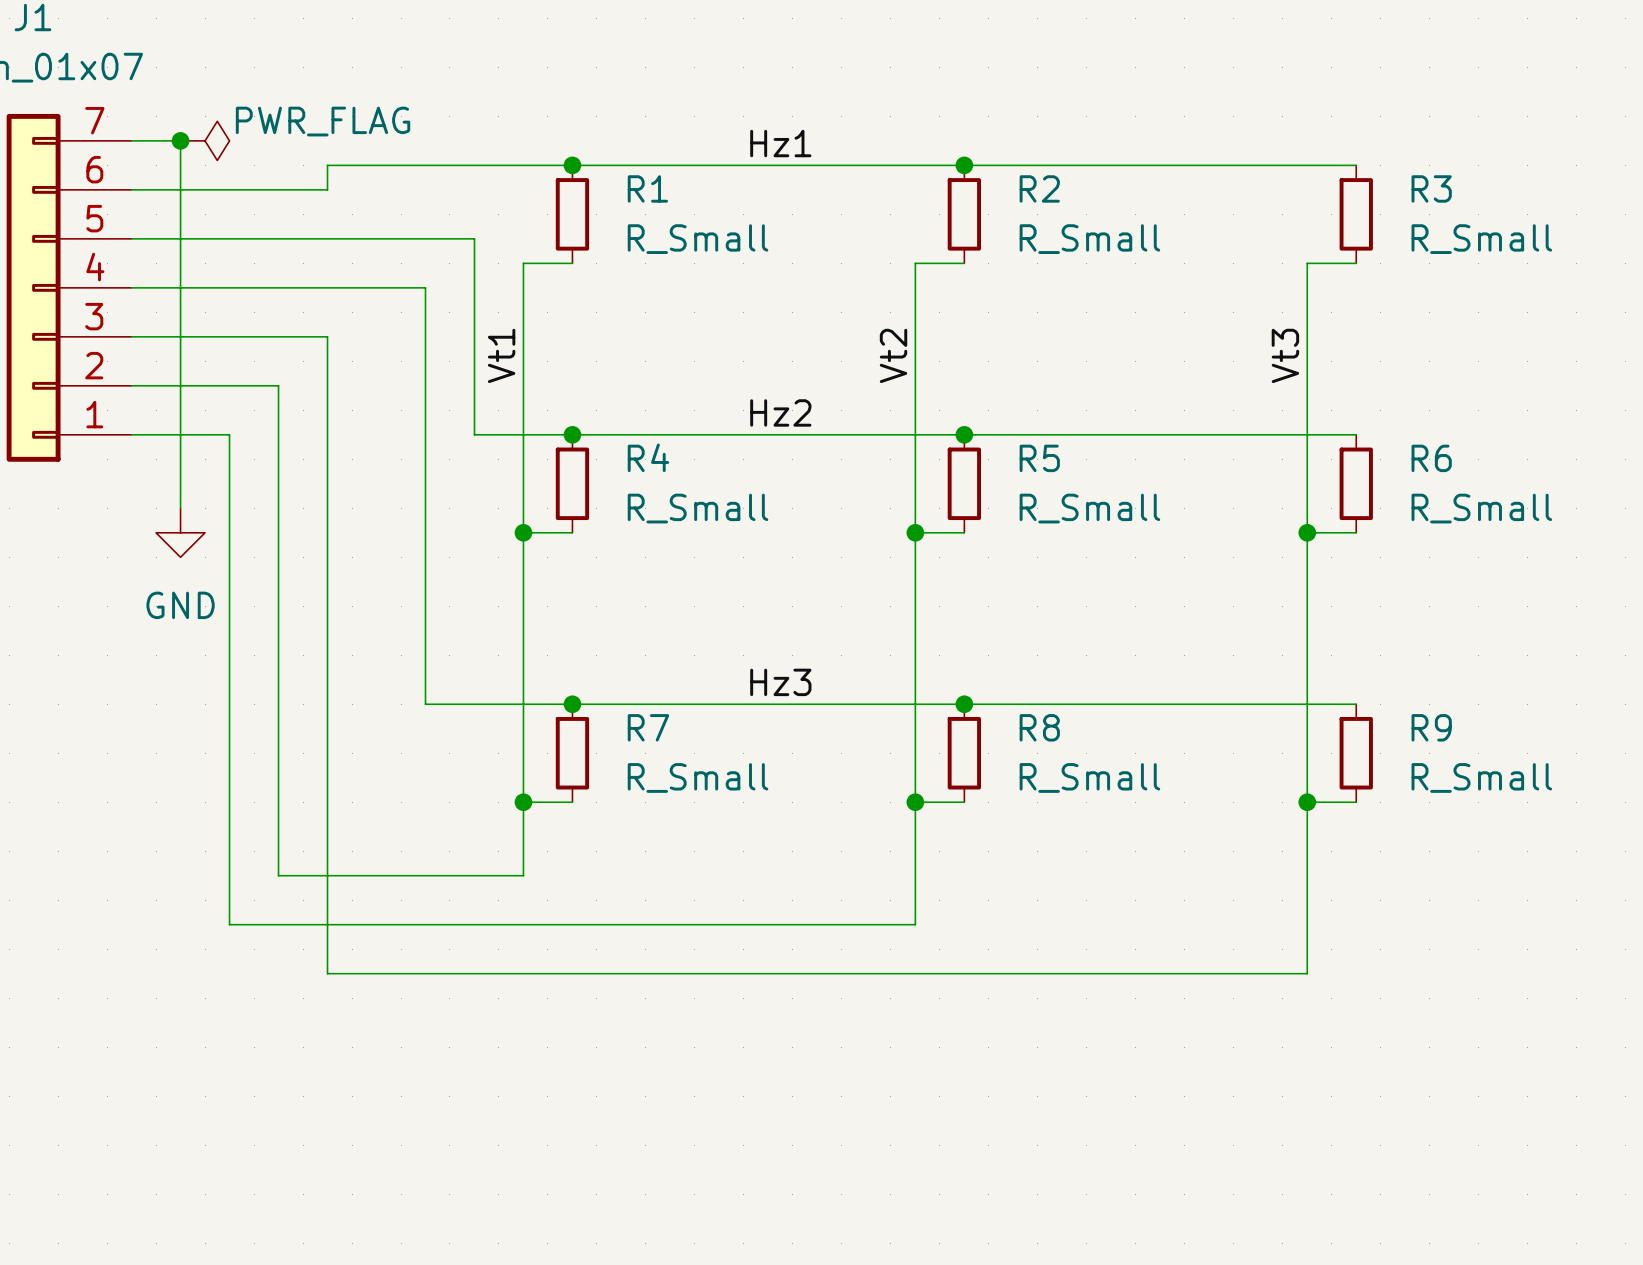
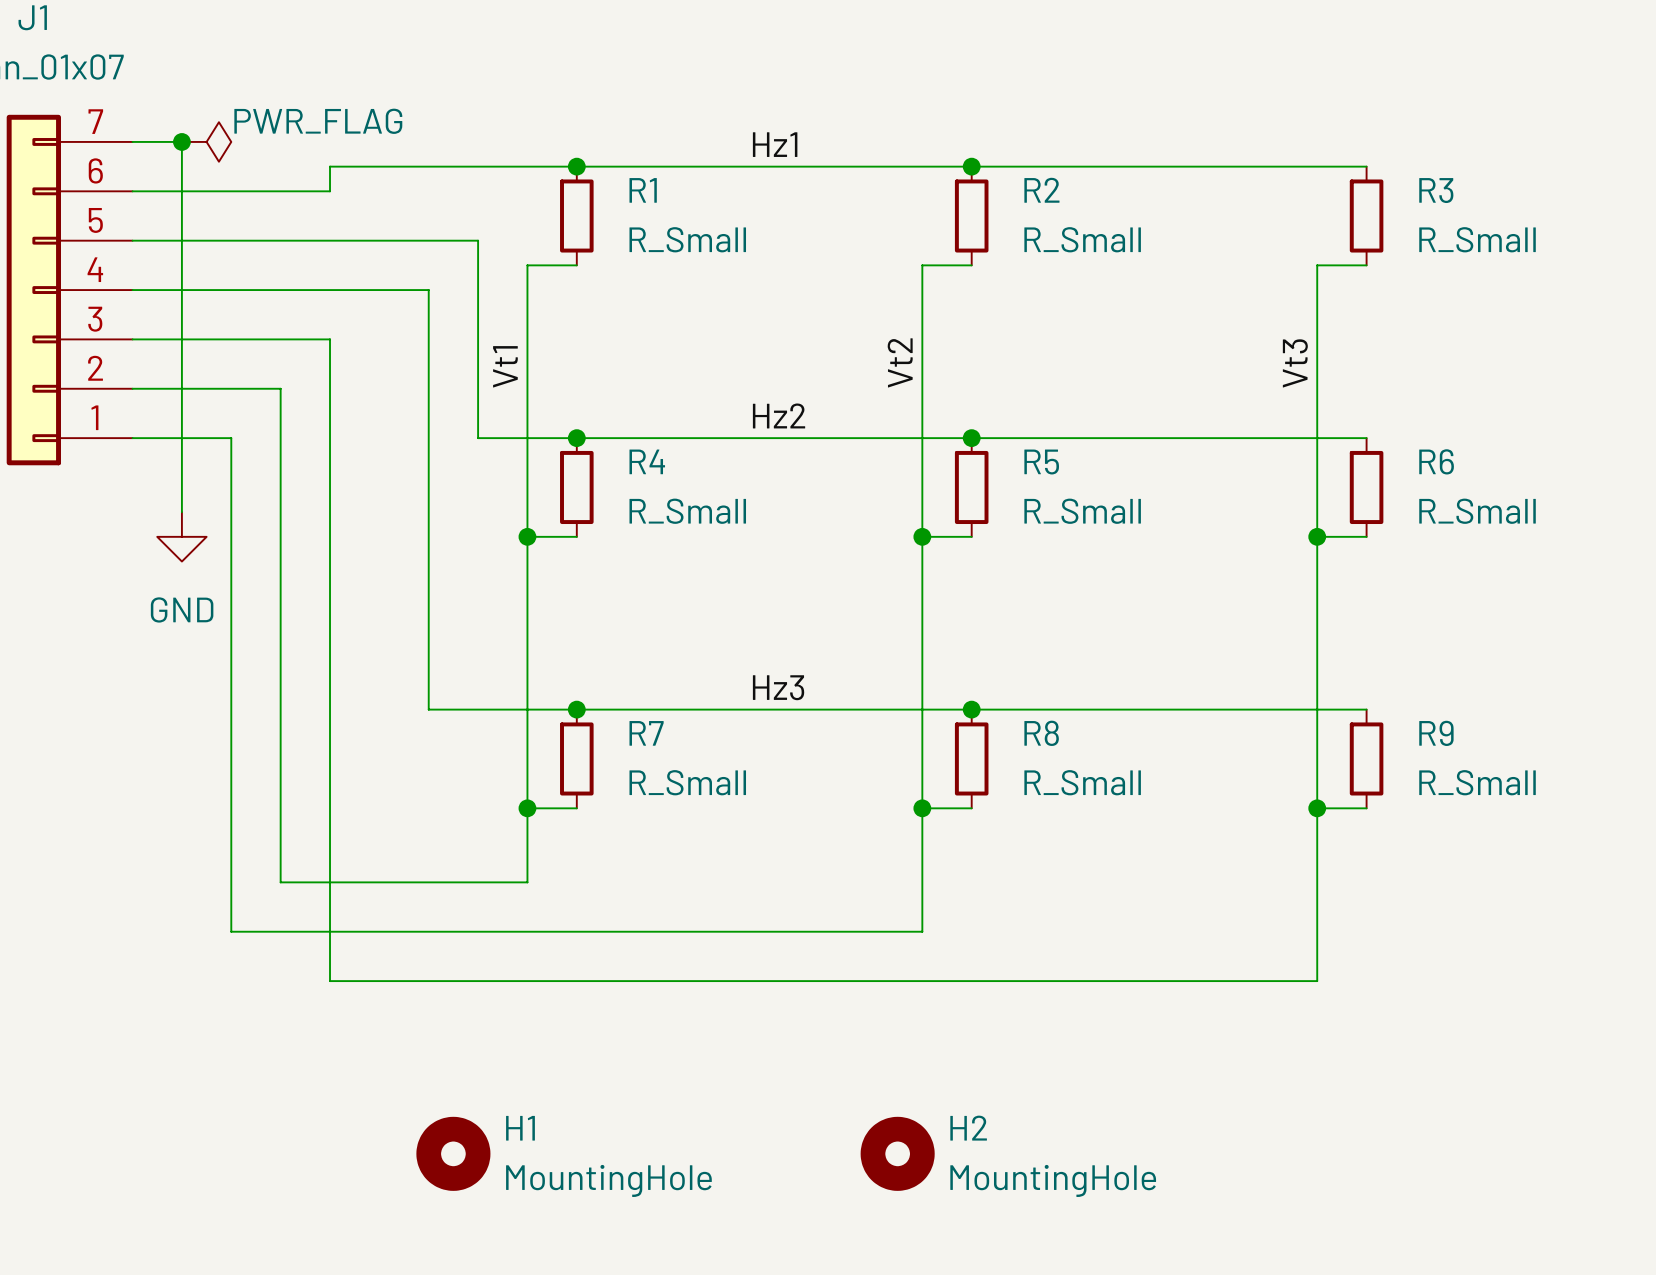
H1: none -> MountingHole (453, 1153)
H2: none -> MountingHole (897, 1153)

